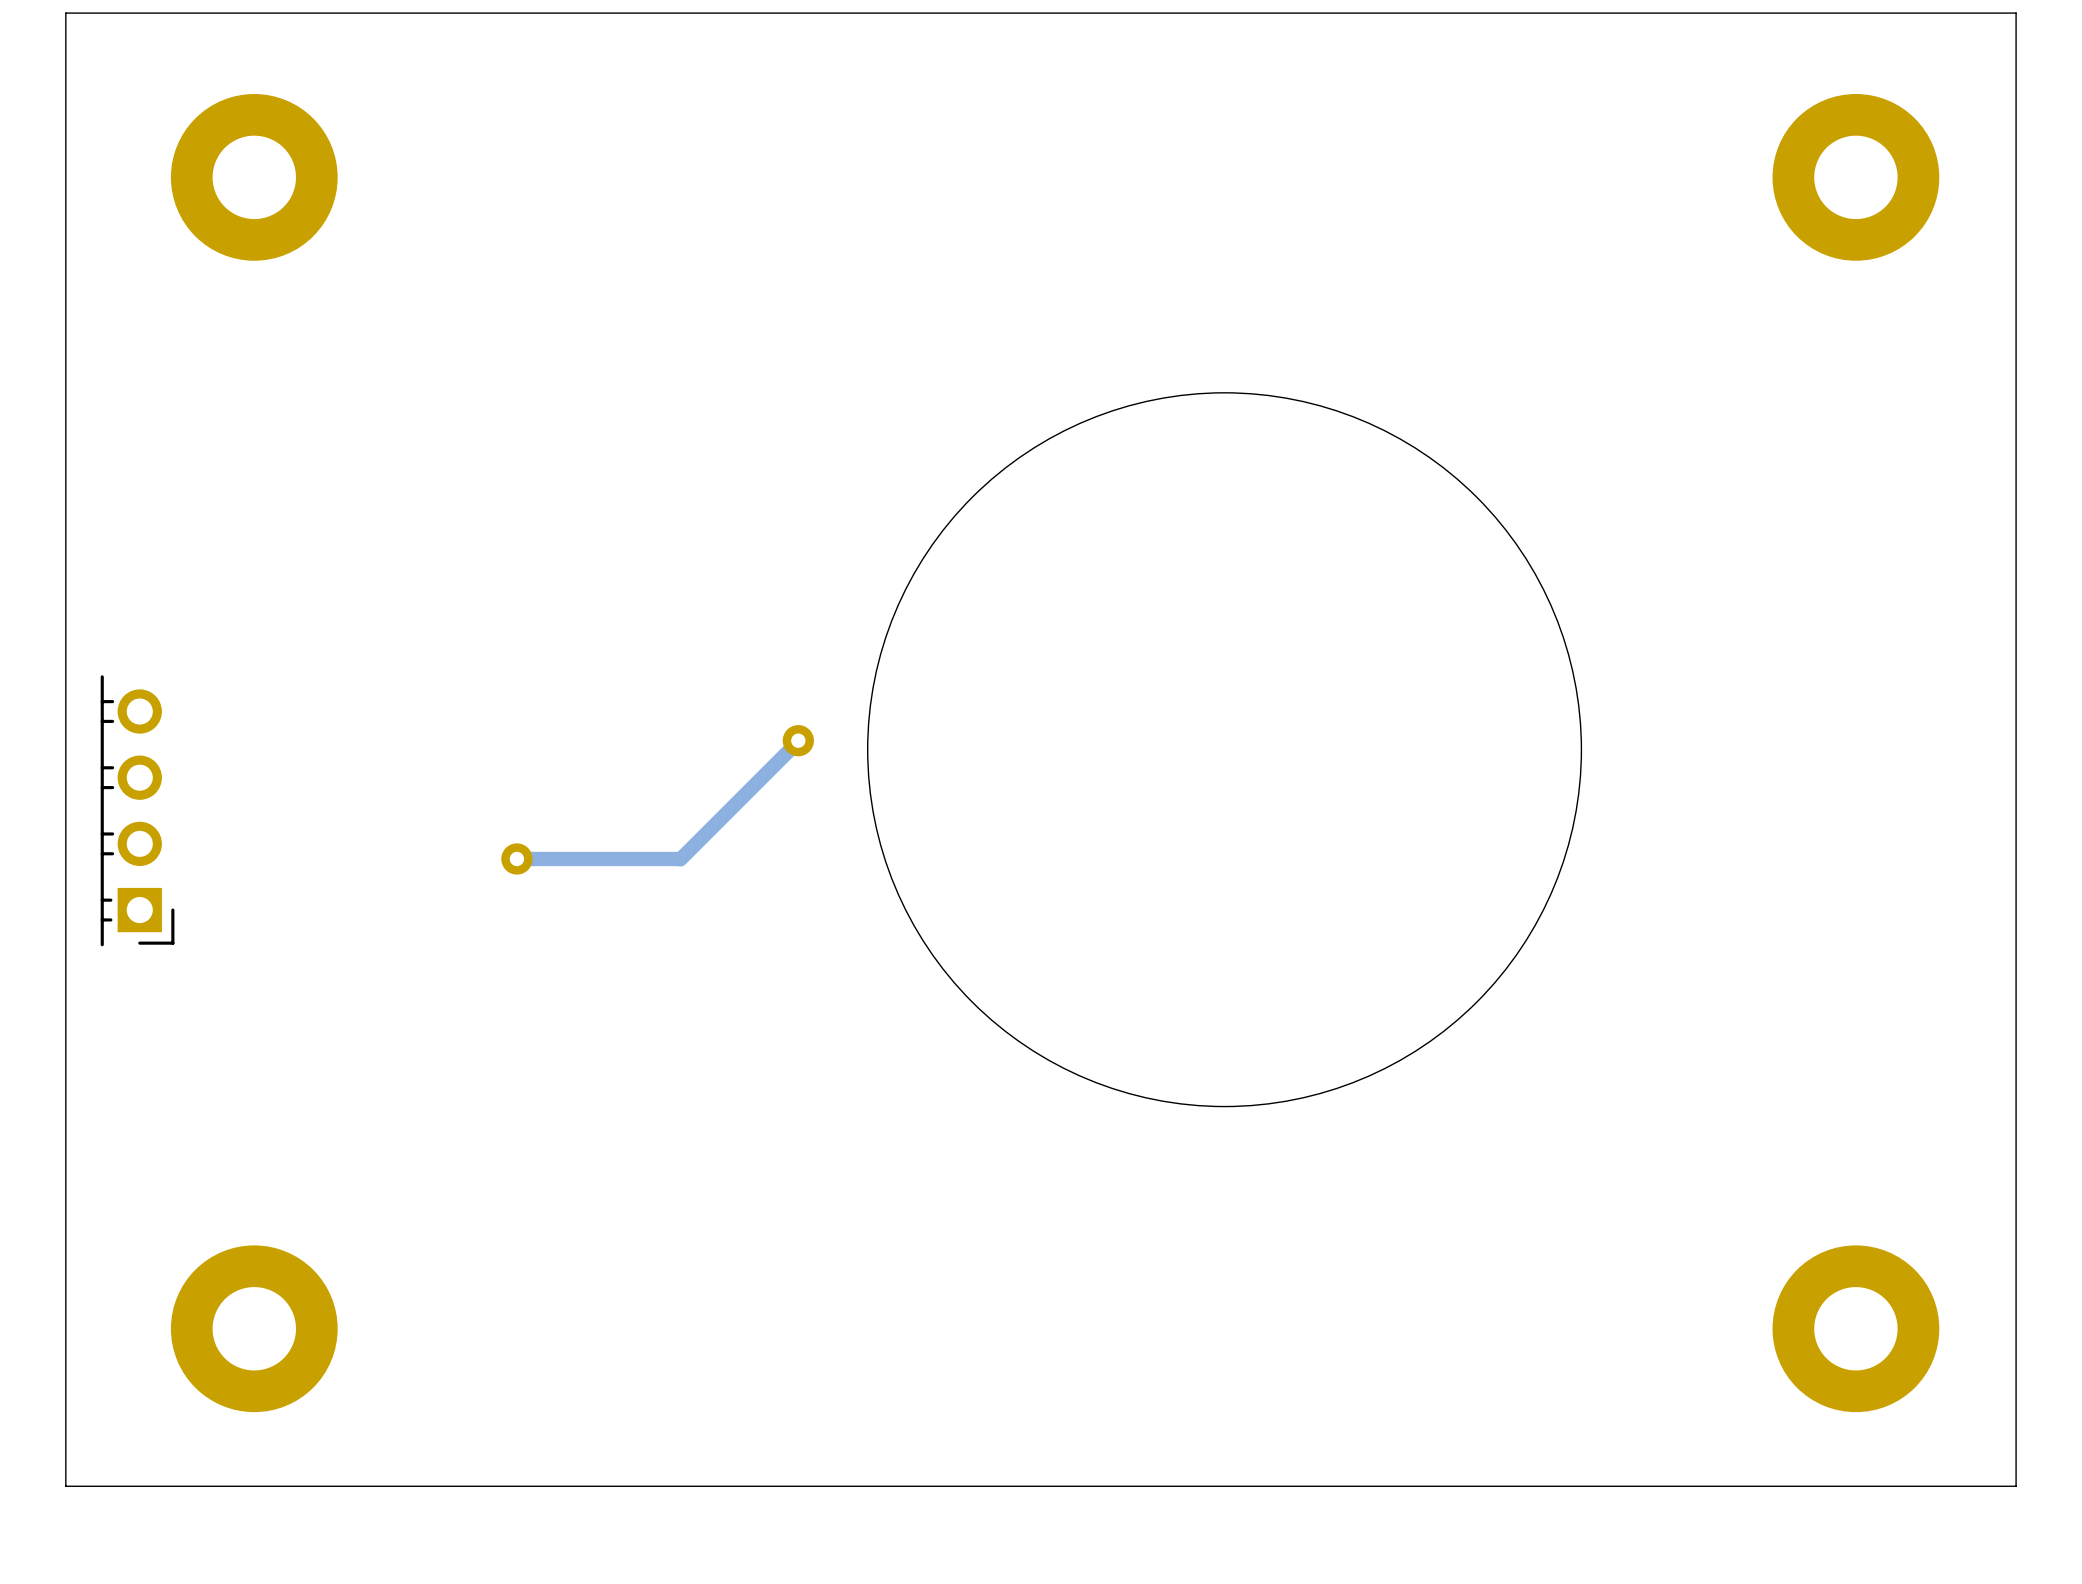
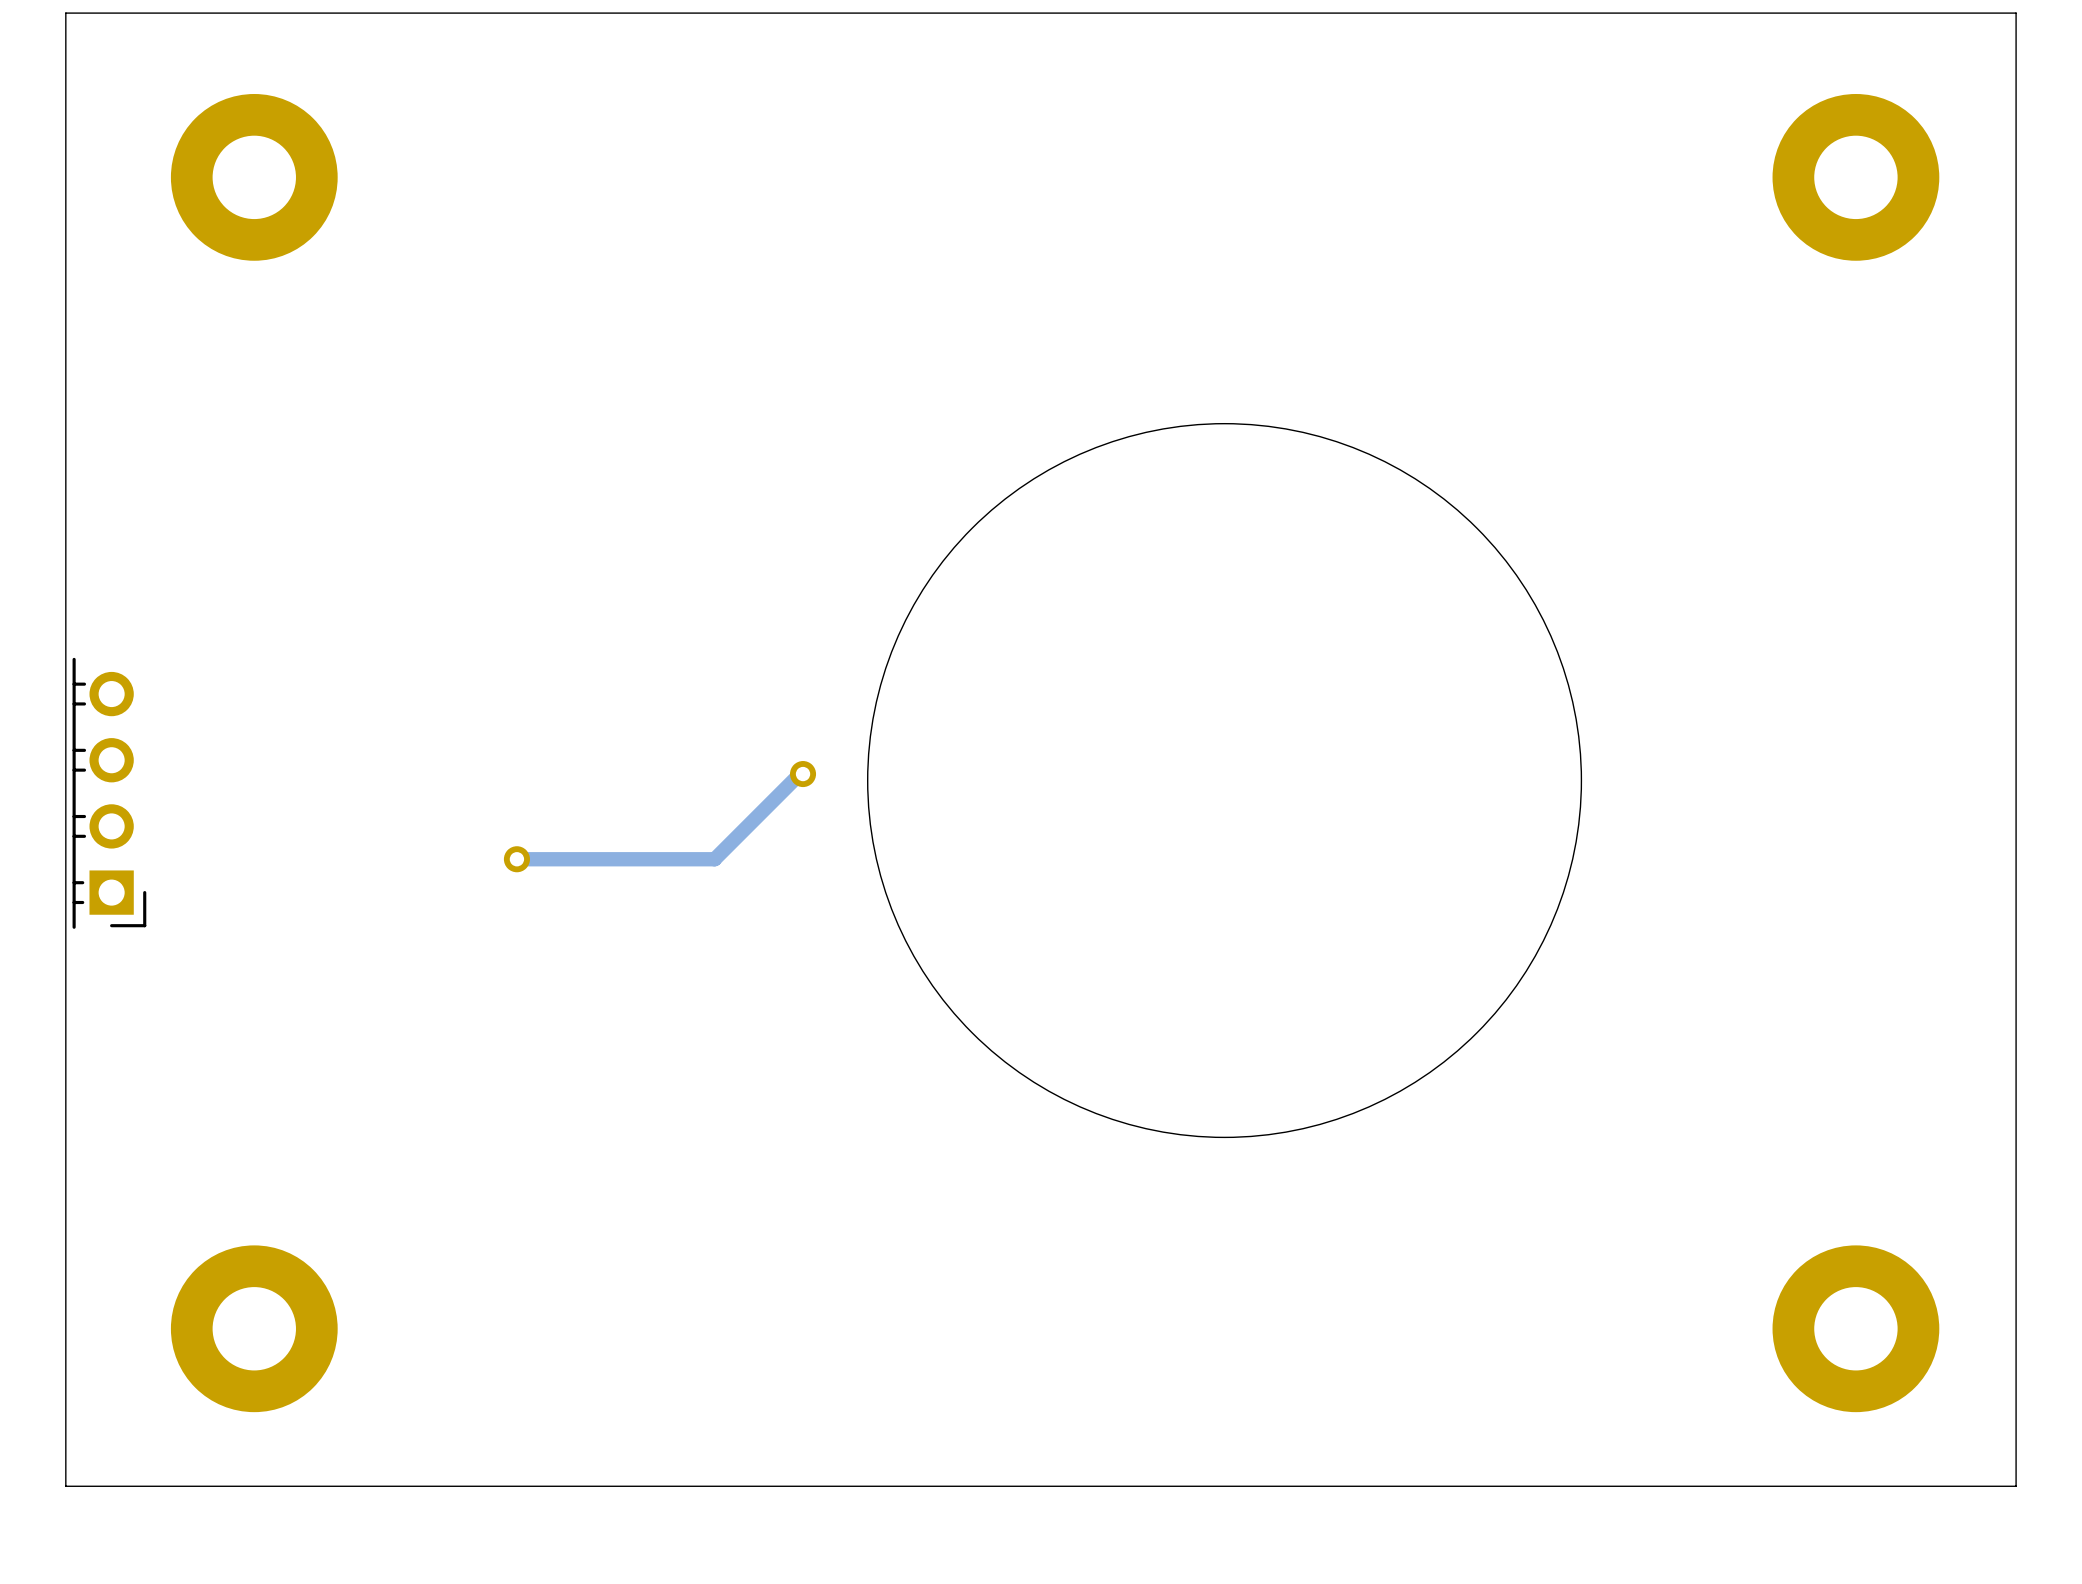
part footprint: [501, 725, 814, 875] -> [503, 761, 817, 873]
round board edge position: (1224, 749) -> (1224, 780)
part position: (137, 810) -> (109, 793)

